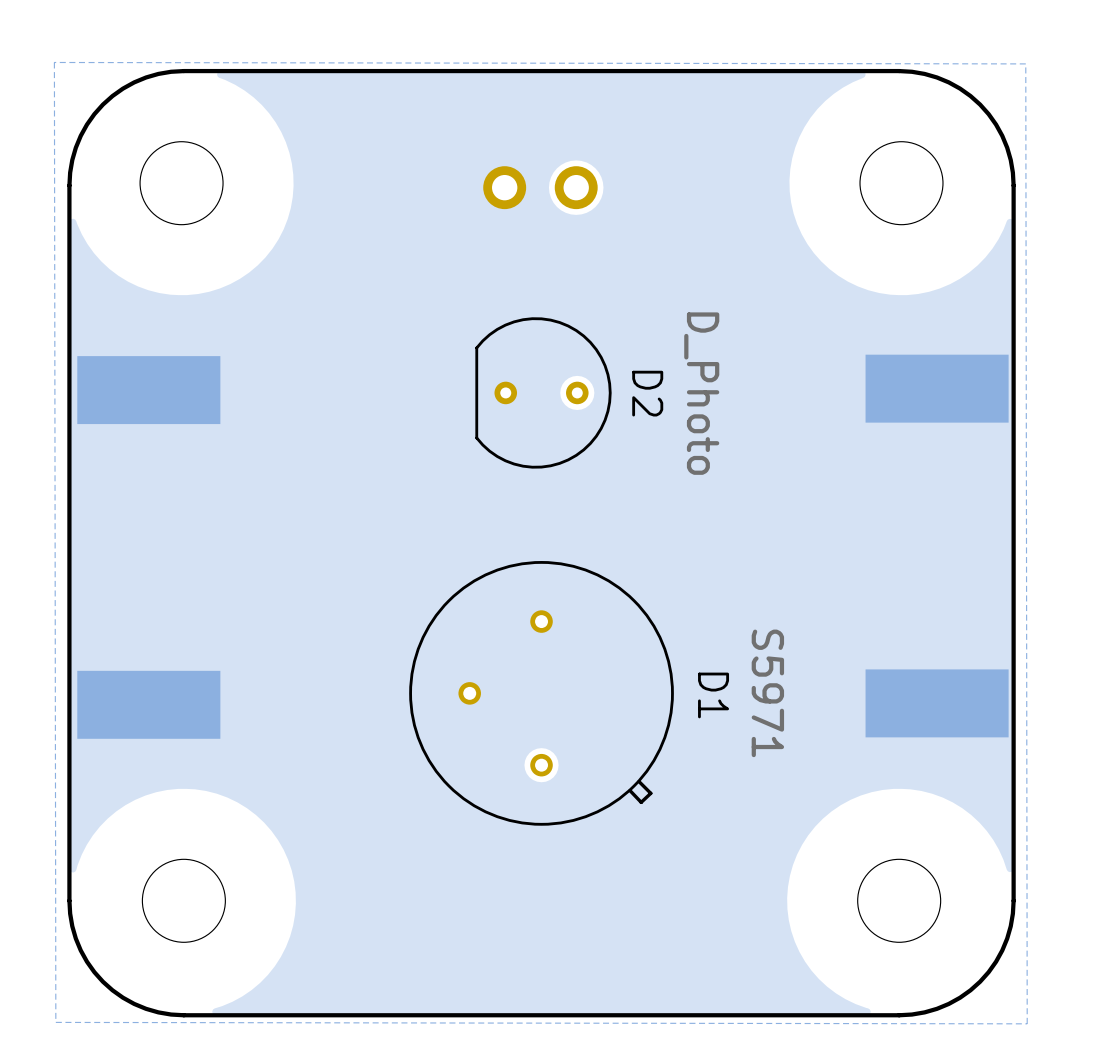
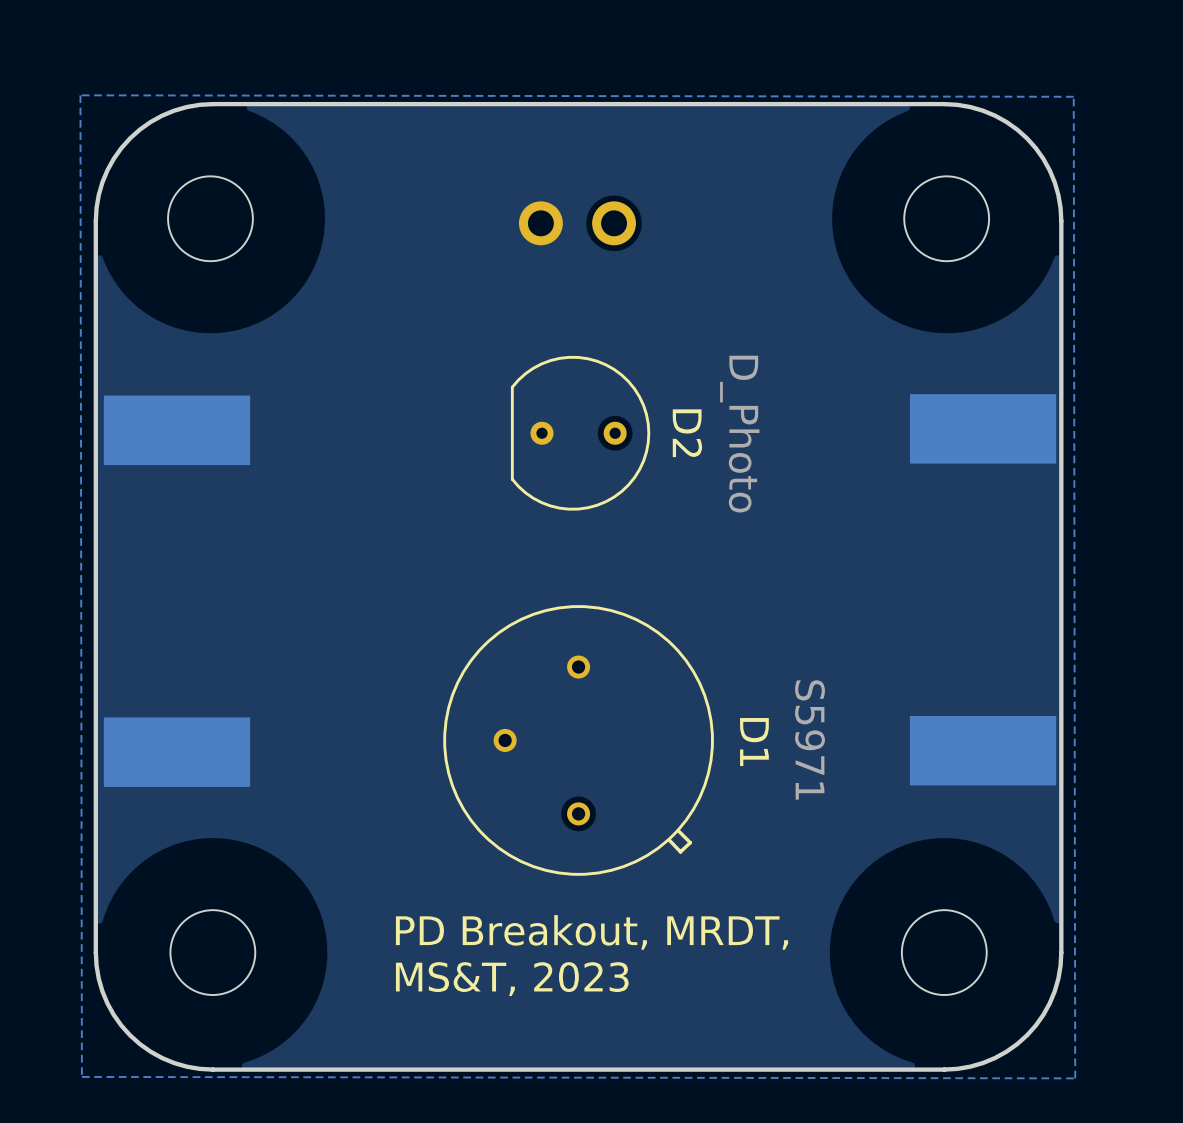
text: none -> PD Breakout, MRDT, (592, 932)
text: none -> MS&T, 2023 (512, 979)

